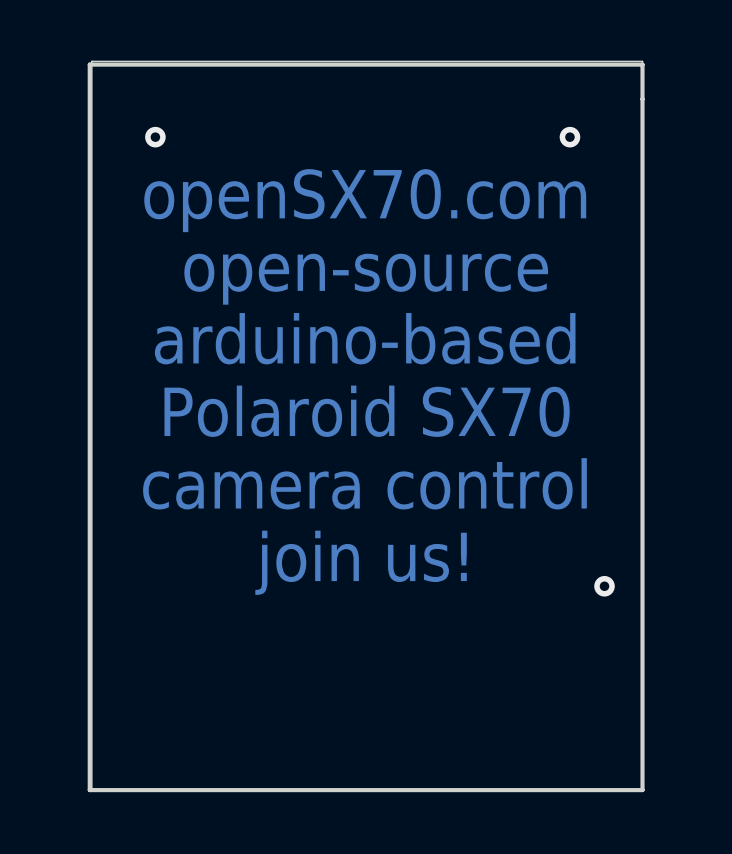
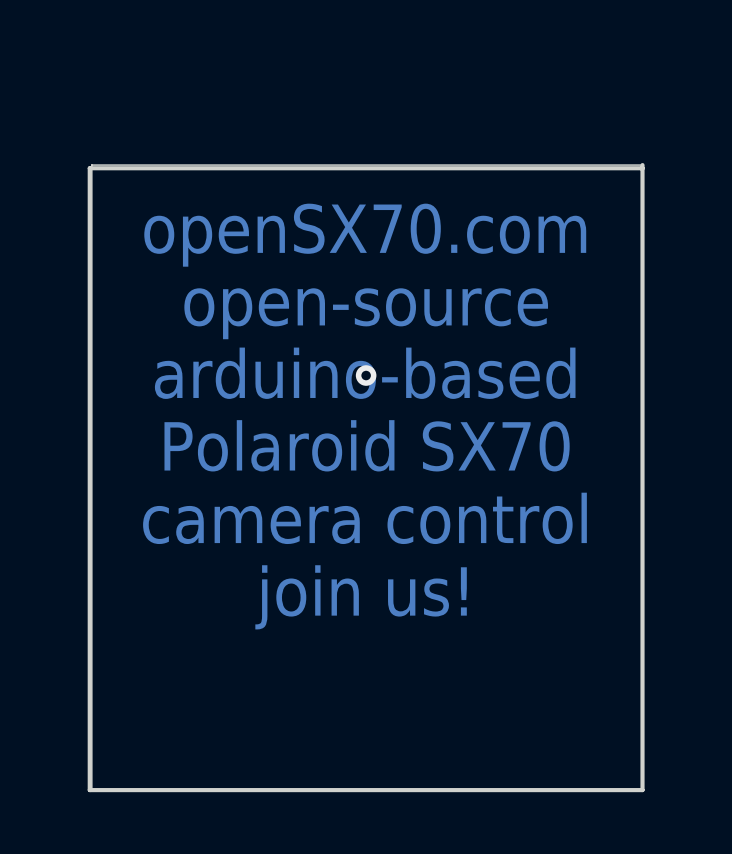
board edge: (642, 64) (642, 61) (91, 61) (91, 165) -> (642, 165) (91, 165)
board edge: (642, 64) (89, 64) (89, 168) -> (642, 168) (89, 168)
board edge: (642, 64) (642, 165) -> none
via: (155, 137) -> none
via: (569, 137) -> none
text position: openSX70.com (365, 200) -> openSX70.com (365, 235)
text position: open-source (366, 279) -> open-source (366, 313)
text position: arduino-based (365, 338) -> arduino-based (365, 373)
via: none -> (366, 375)
text position: Polaroid SX70 (367, 411) -> Polaroid SX70 (367, 445)
text position: camera control (364, 483) -> camera control (364, 518)
text position: join us! (361, 562) -> join us! (361, 597)
via: (604, 586) -> none

